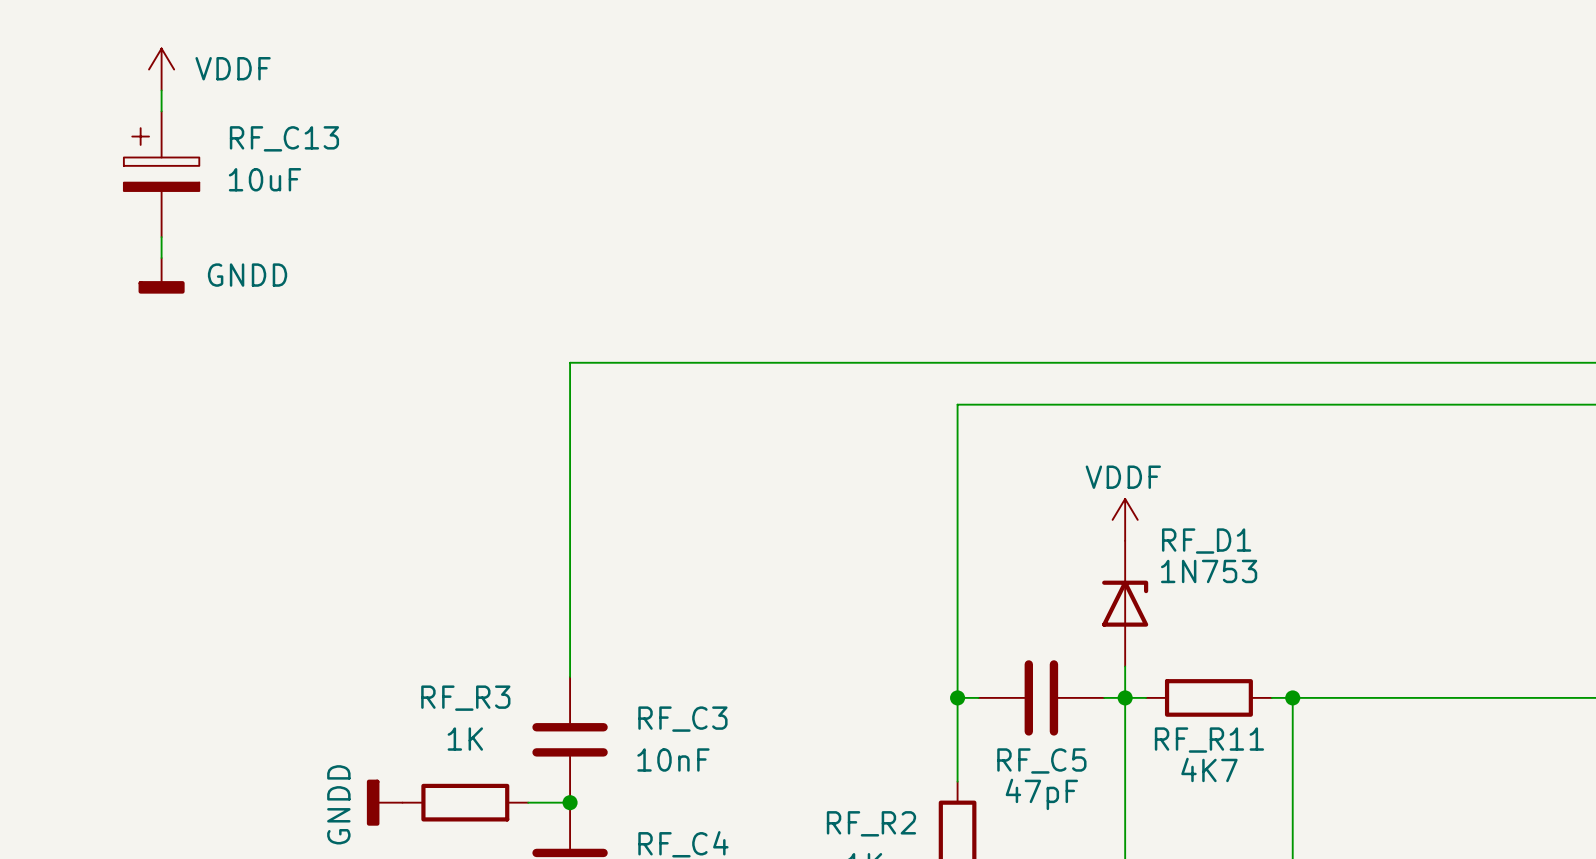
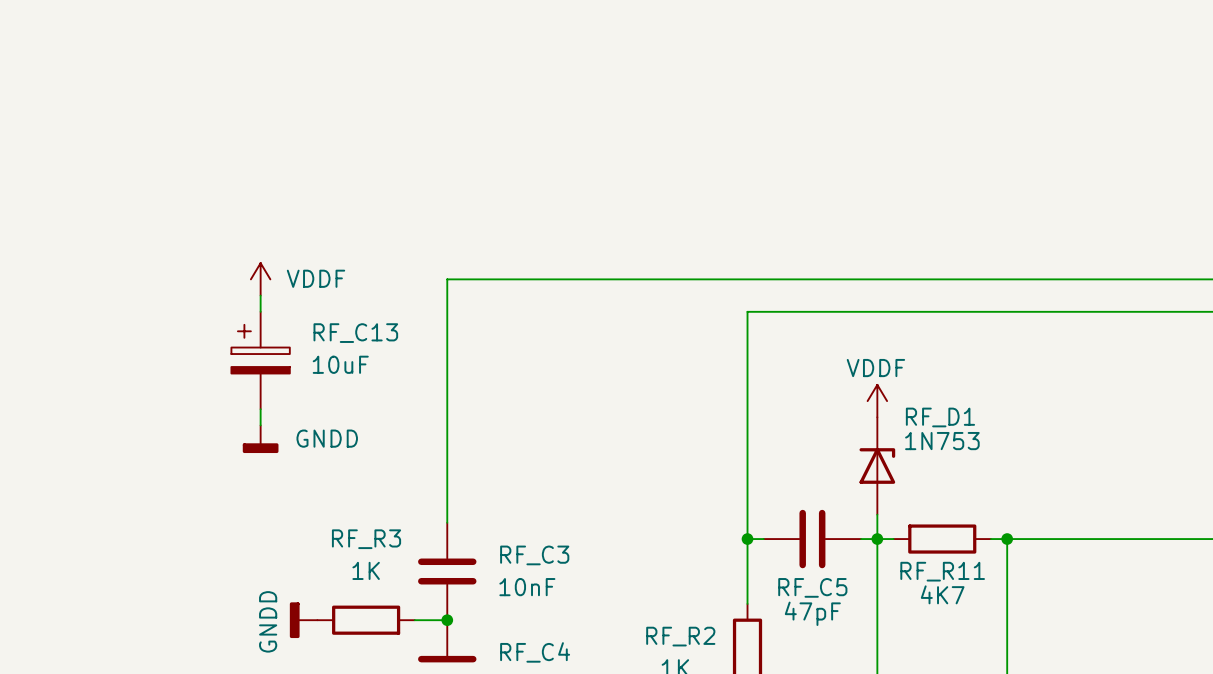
power symbol position: VDDF (161, 69) -> VDDF (260, 279)
wire: (161, 90) (161, 111) -> none
RF_C13 position: (161, 174) -> (260, 360)
wire: (161, 237) (161, 258) -> (260, 295) (260, 311)
power symbol position: GNDD (161, 275) -> GNDD (260, 439)
wire: none -> (260, 409) (260, 425)

